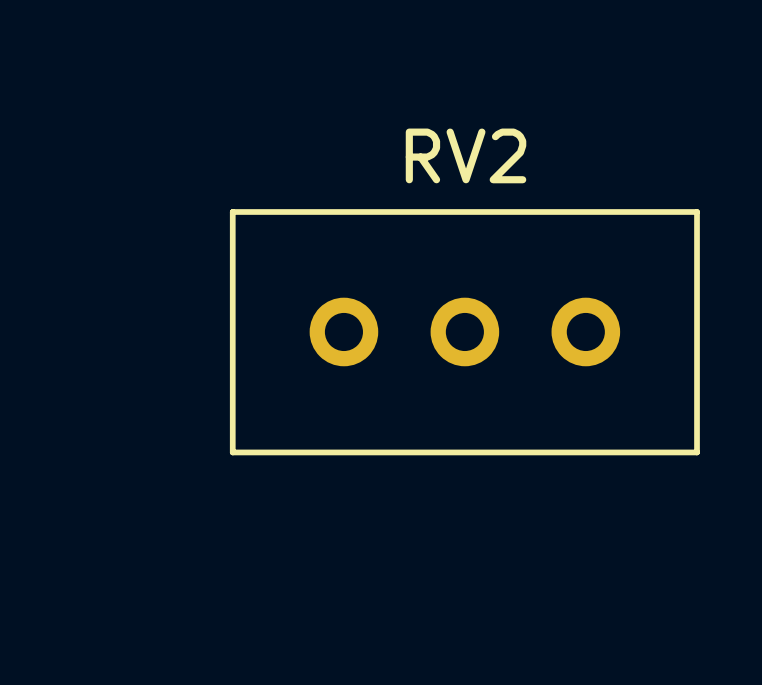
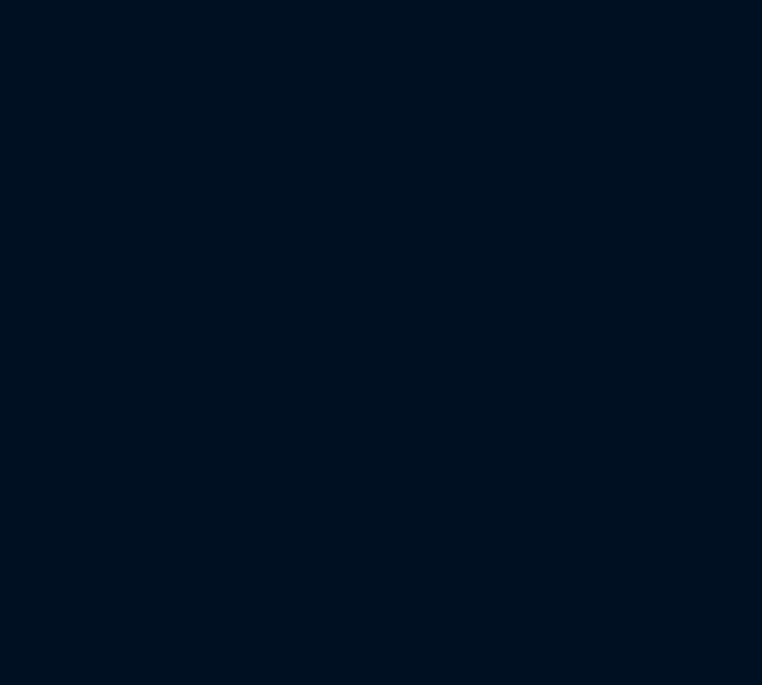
RV2: (464, 332) -> none

